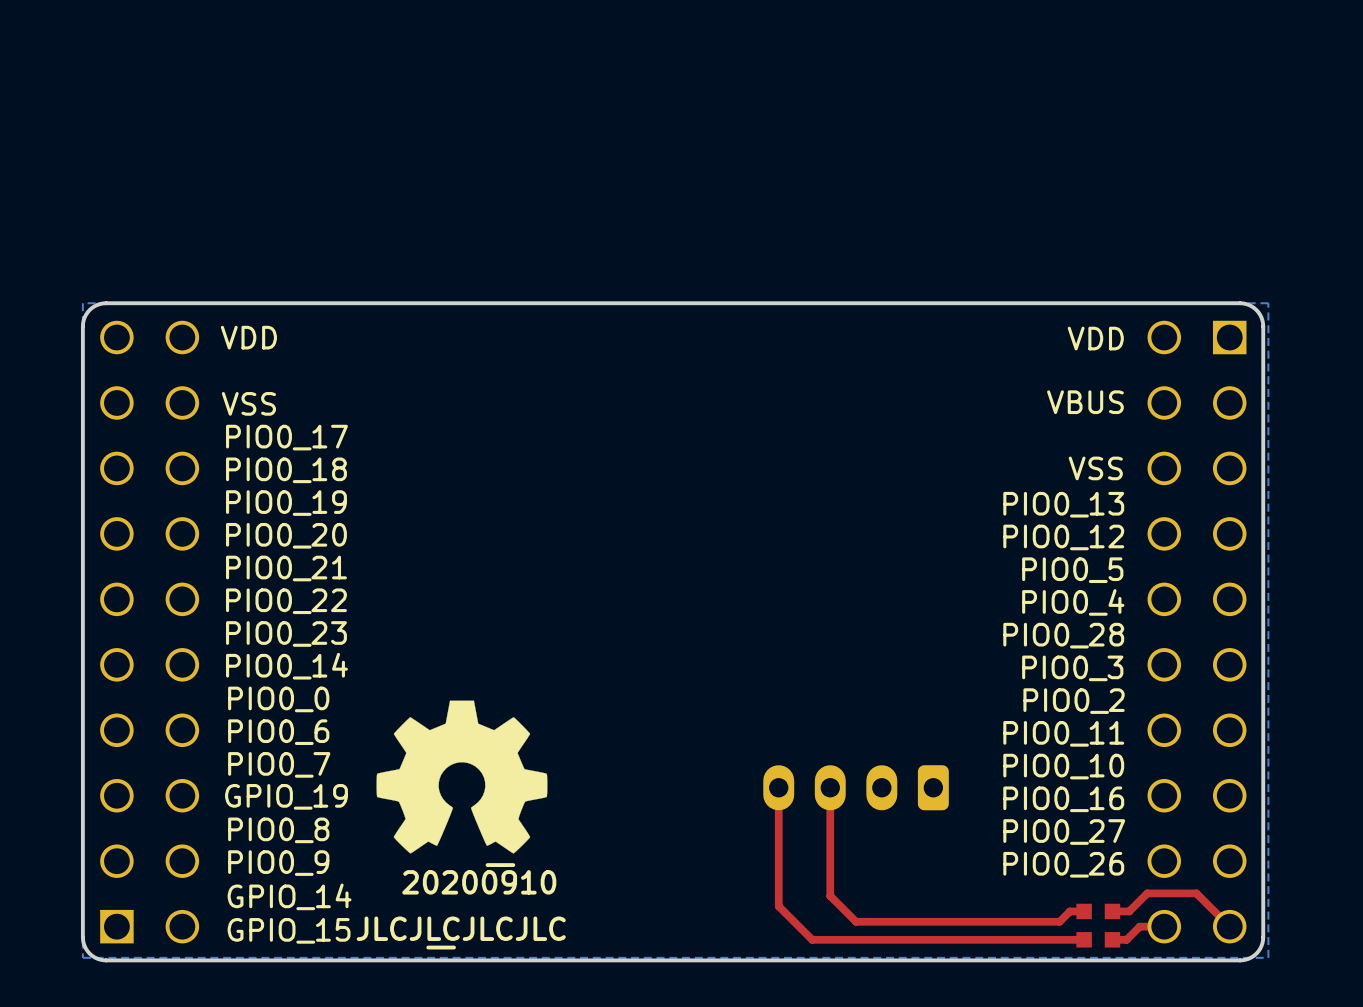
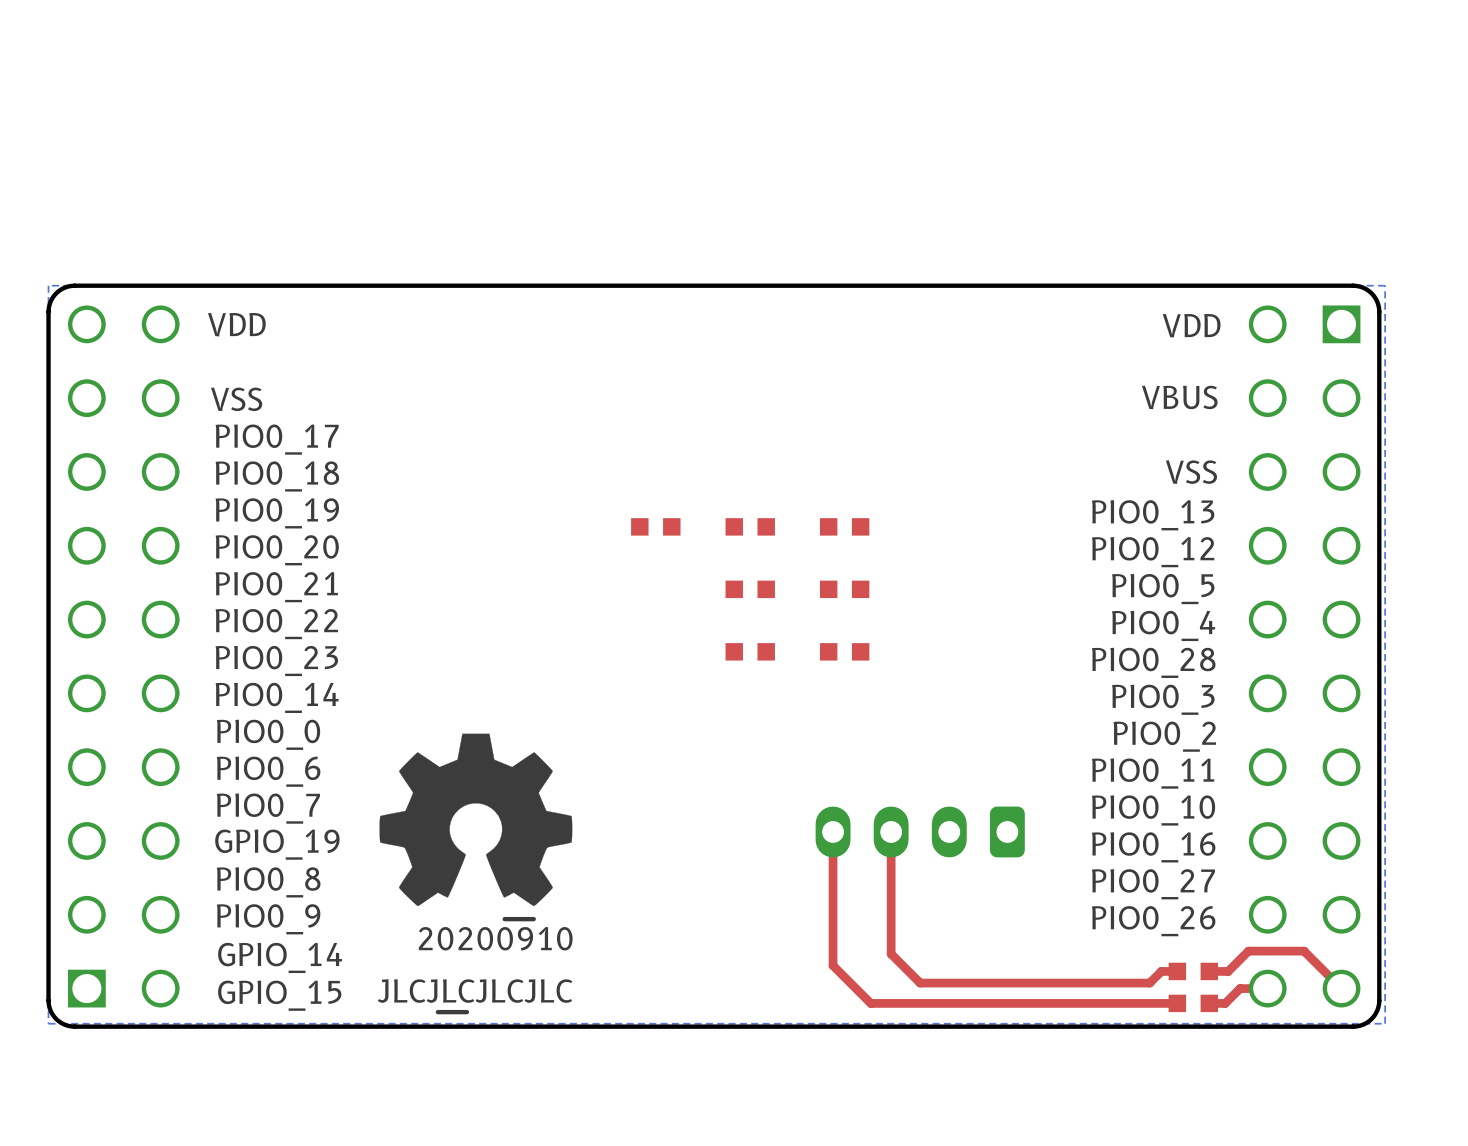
part: none -> (655, 526)
part: none -> (750, 526)
part: none -> (844, 526)
part: none -> (750, 589)
part: none -> (844, 589)
part: none -> (750, 651)
part: none -> (844, 651)

